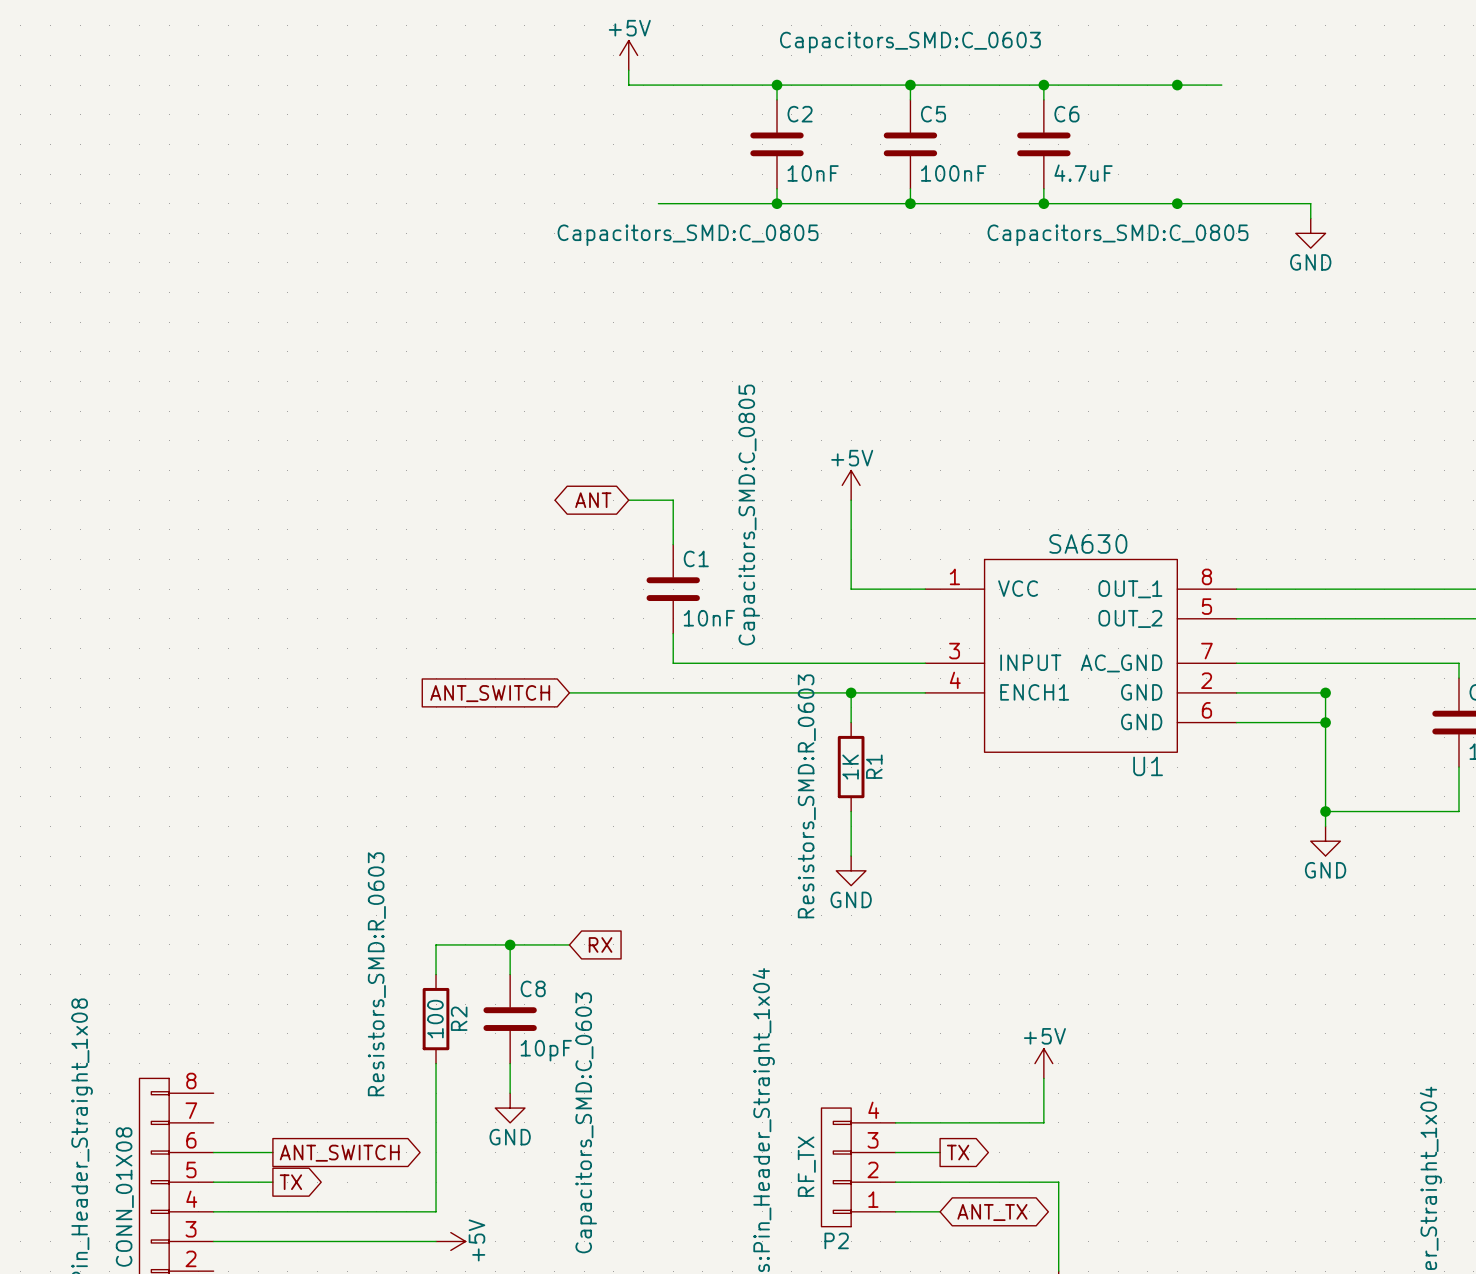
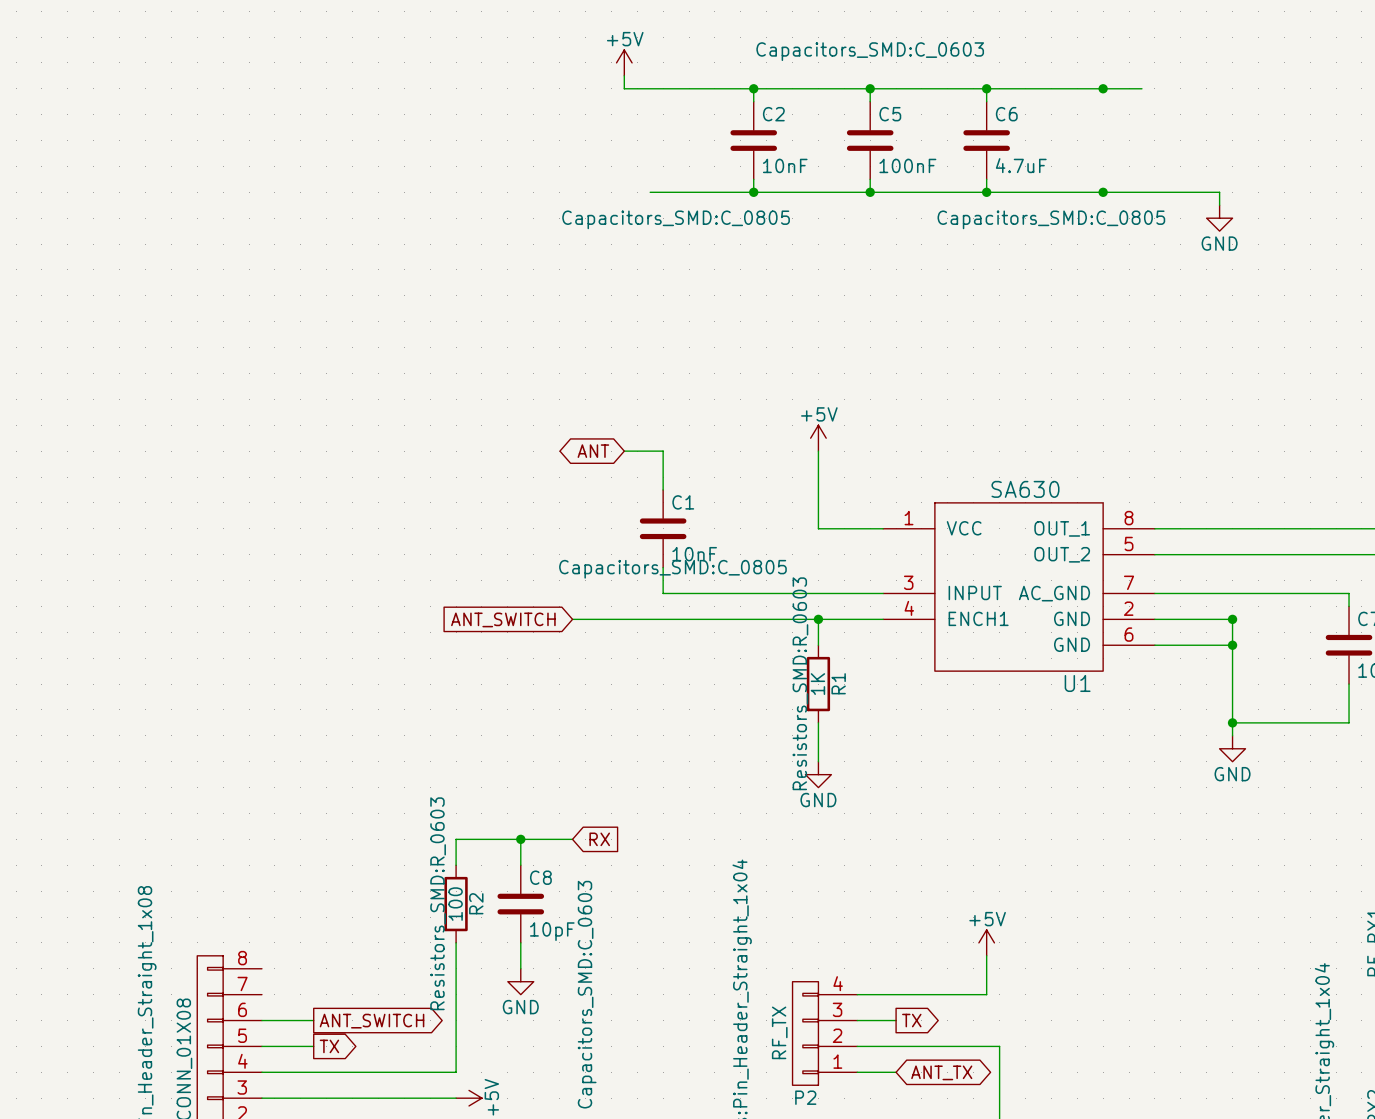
C1 text rotation: 0° (749, 515) -> 90° clockwise (672, 569)
R1 text position: Resistors_SMD:R_0603 (806, 796) -> Resistors_SMD:R_0603 (800, 683)
R2 text position: Resistors_SMD:R_0603 (376, 974) -> Resistors_SMD:R_0603 (438, 903)

